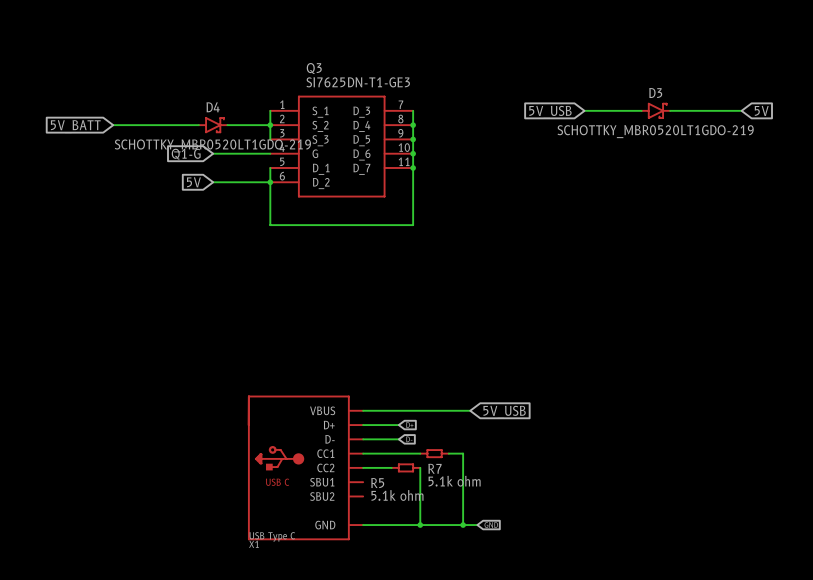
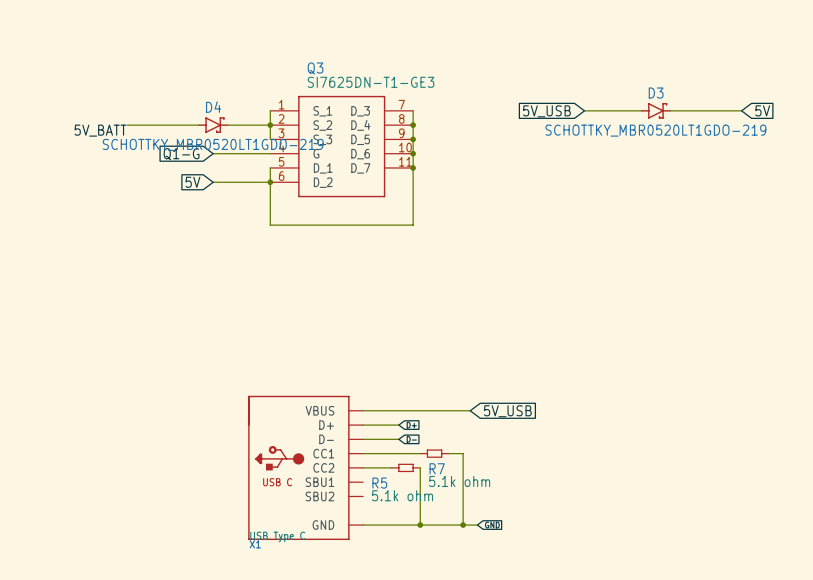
wire: (113, 125) (127, 125) -> none
global label: 5V_BATT (75, 126) -> none
label: none -> 5V_BATT (100, 130)

